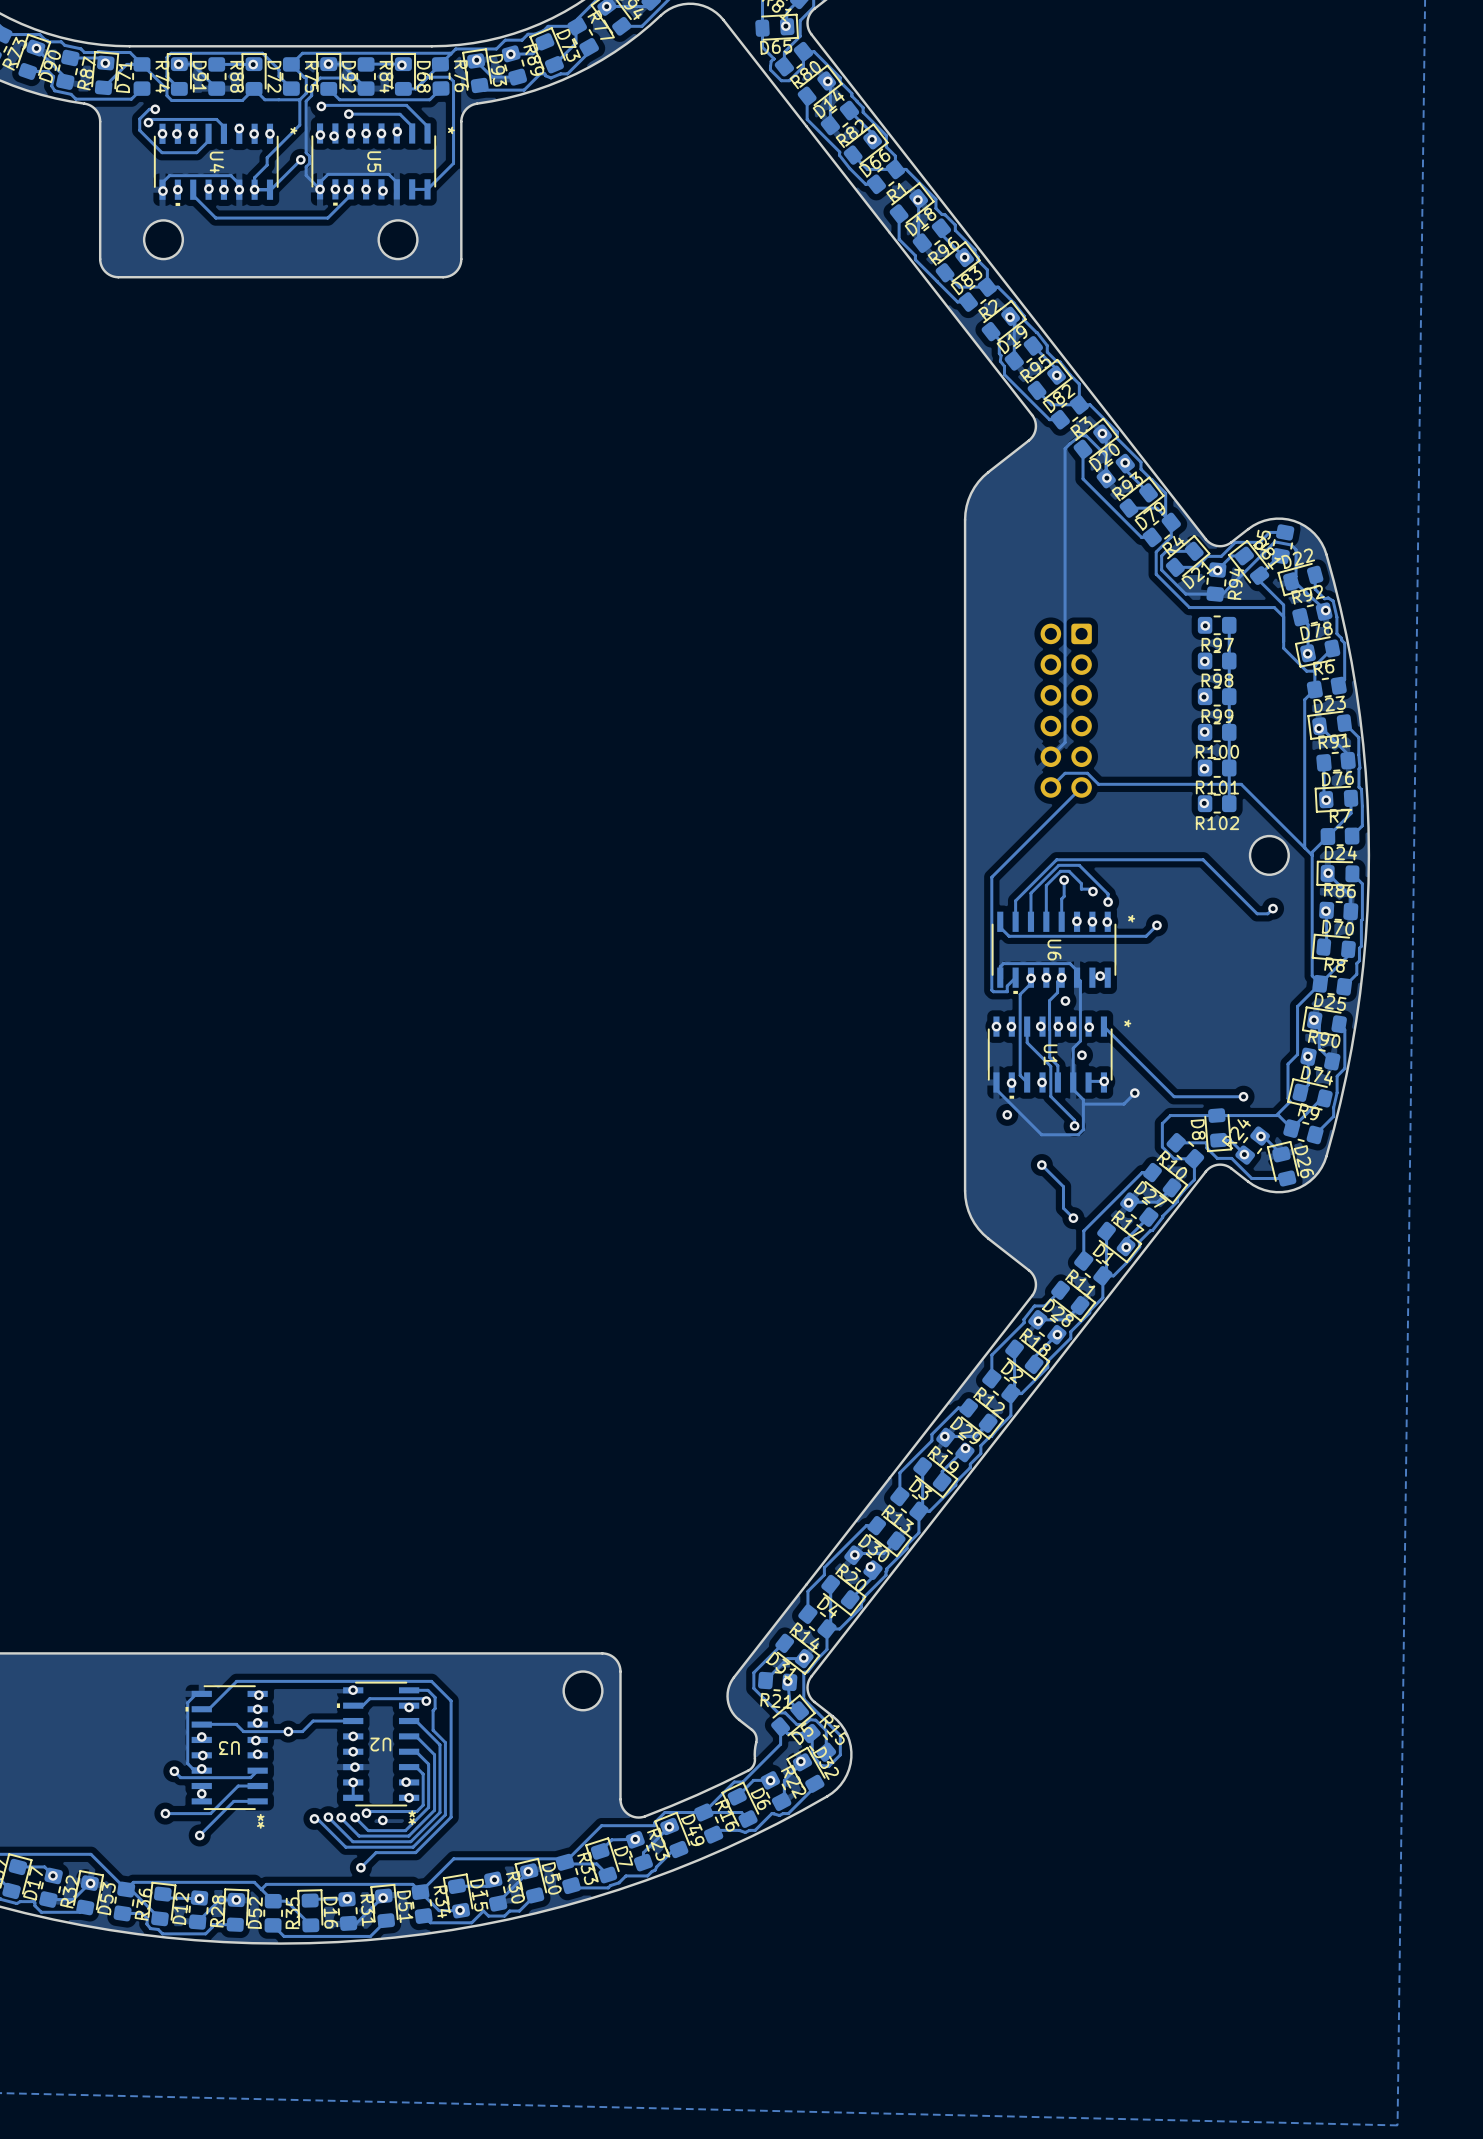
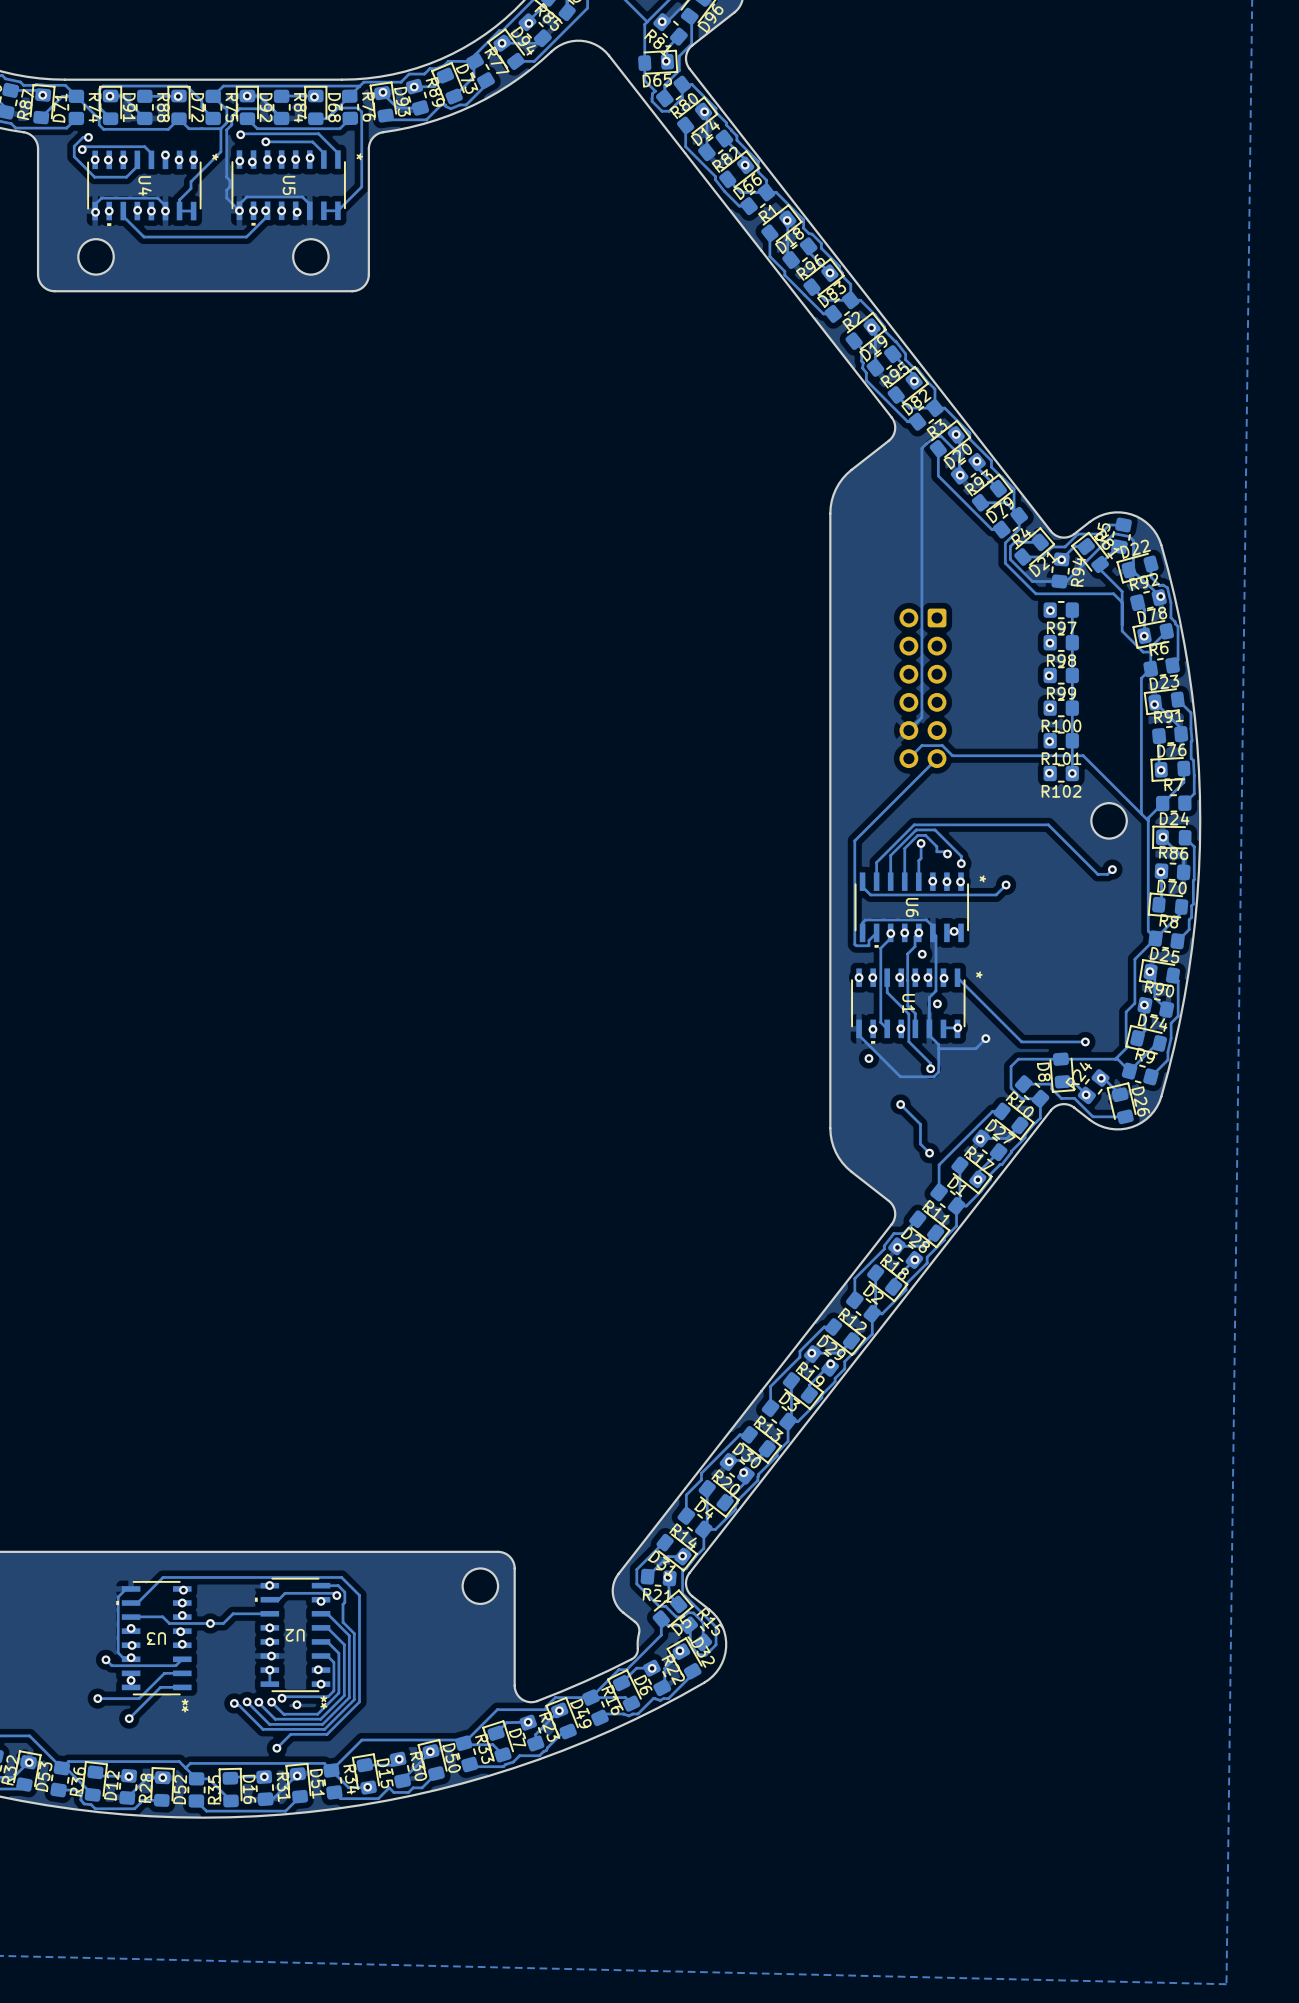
track: (300, 159) (269, 189) -> none
via: (300, 159) -> none
via: (254, 189) -> none
via: none -> (1072, 773)

